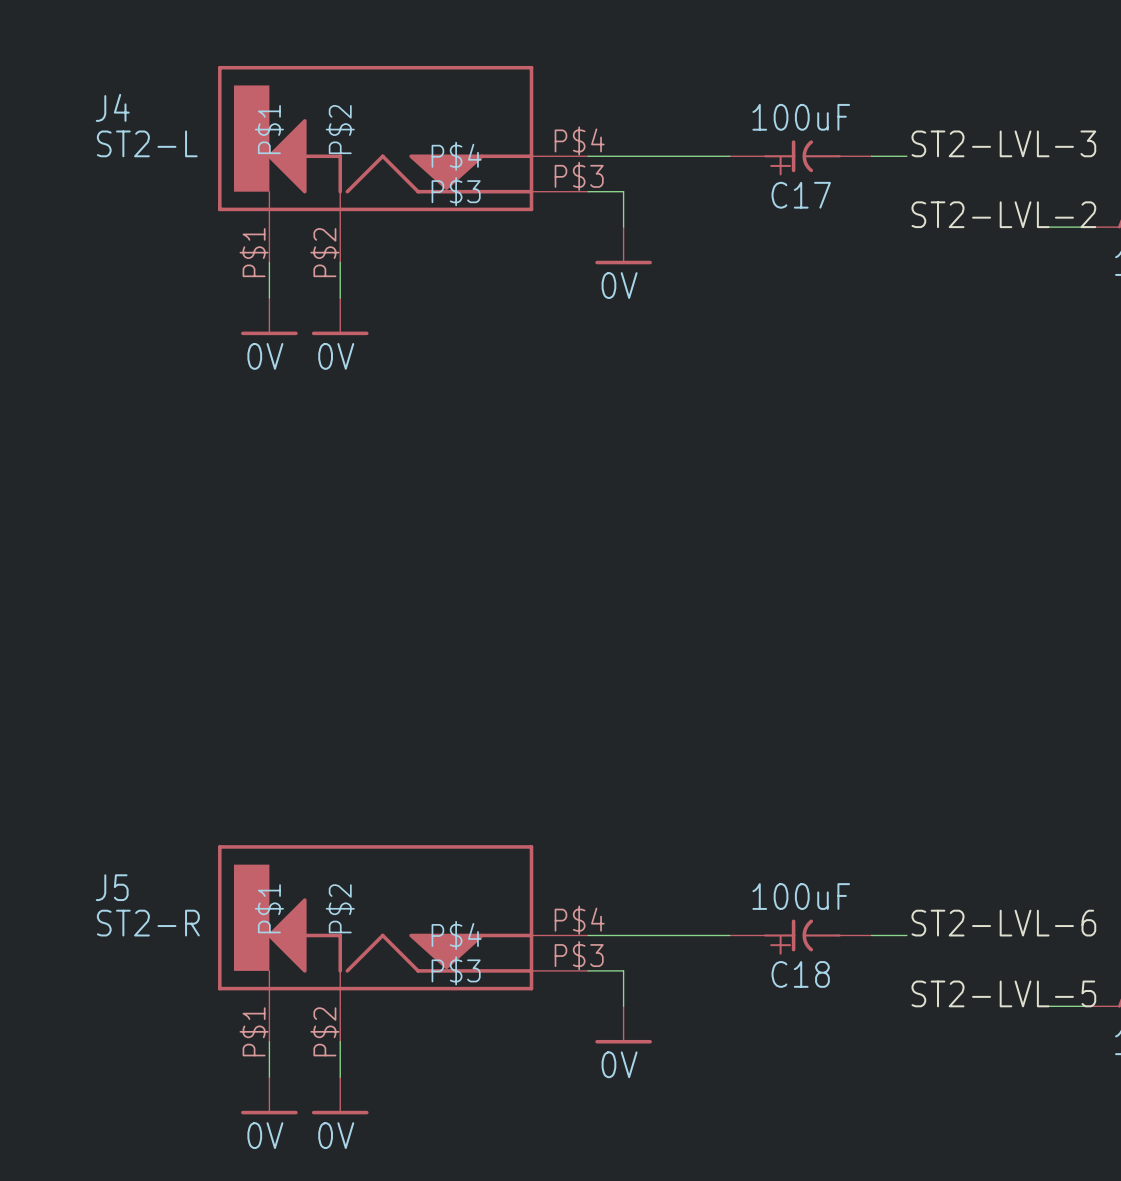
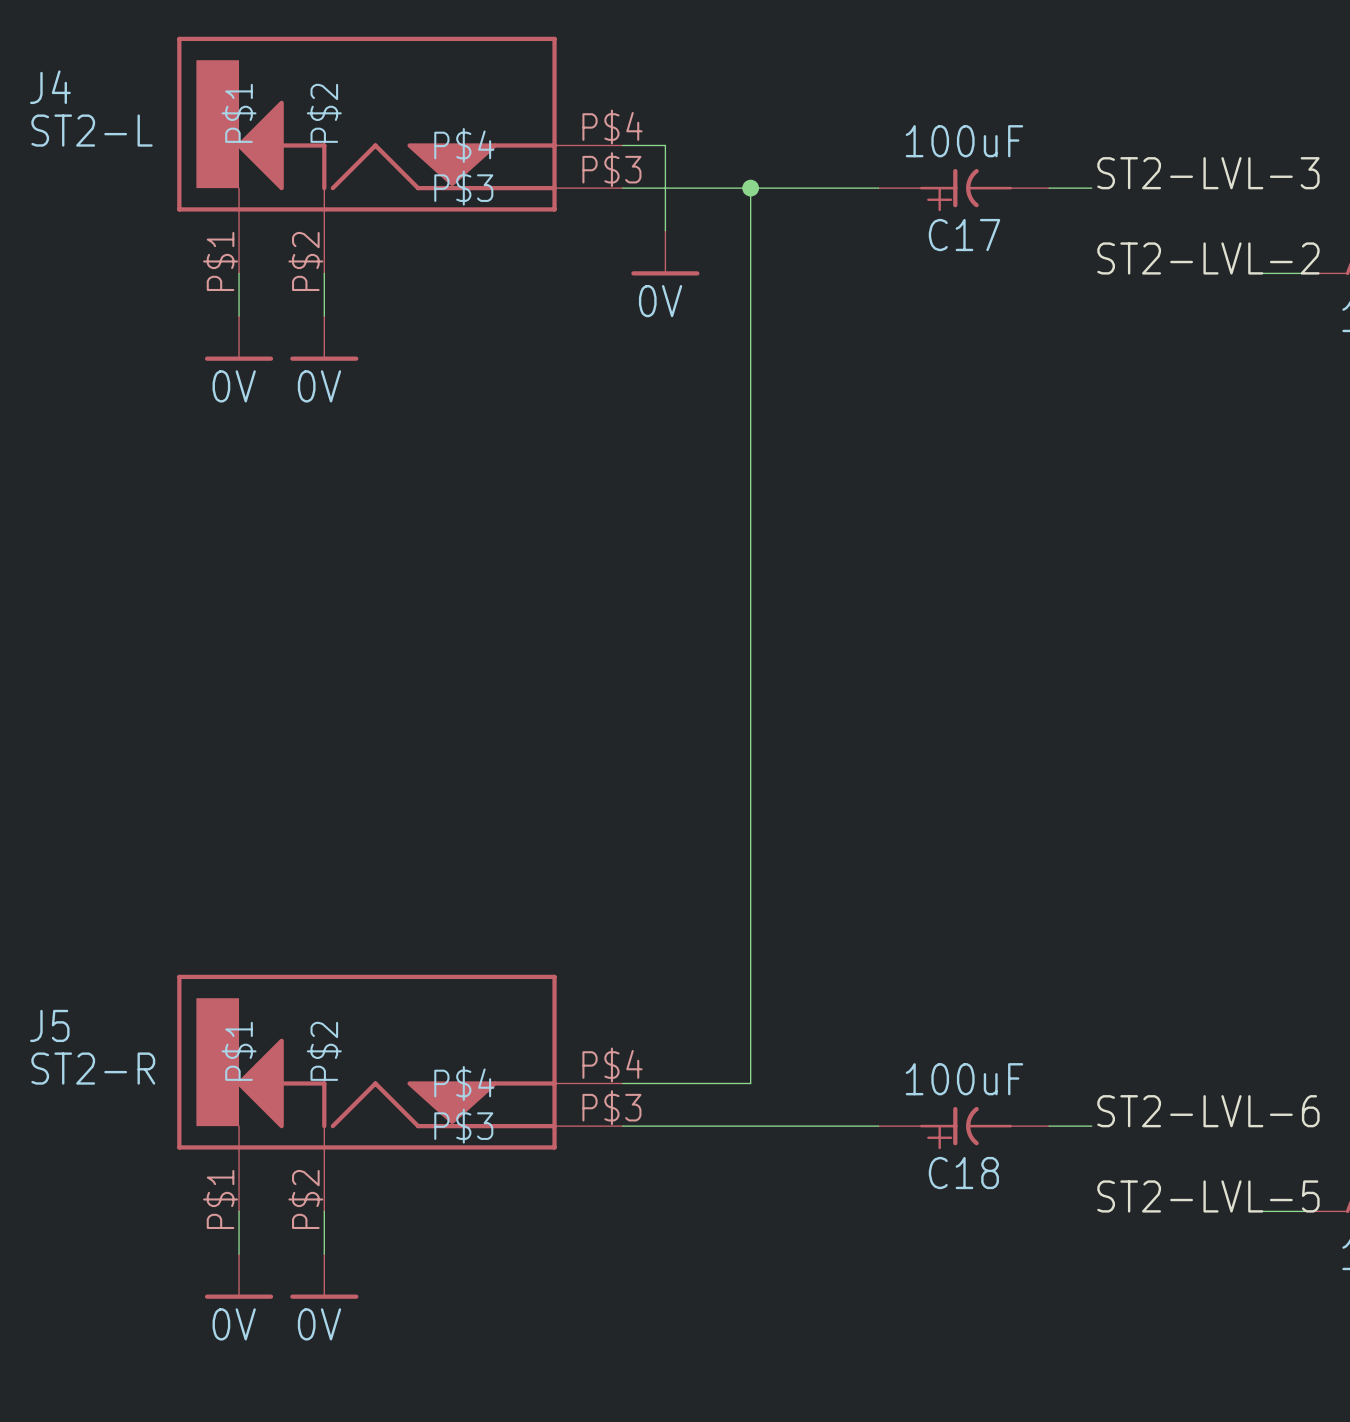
wire: none -> (622, 145) (665, 145) (665, 230)
junction: none -> (750, 188)
J4 position: (403, 164) -> (399, 155)
wire: (588, 191) (623, 191) -> (750, 188) (750, 230)
wire: none -> (750, 273) (750, 1083) (622, 1083)
power symbol position: 0V (623, 245) -> 0V (665, 253)
wire: (340, 262) (340, 297) -> (239, 273) (239, 316)
power symbol: none -> 0V (239, 338)
power symbol position: 0V (269, 316) -> 0V (324, 338)
power symbol: 0V (340, 316) -> none
J5 position: (403, 943) -> (399, 1093)
wire: (588, 970) (623, 970) (623, 1006) -> none
power symbol: 0V (623, 1024) -> none
wire: (340, 1041) (340, 1077) -> (239, 1211) (239, 1254)
power symbol: none -> 0V (239, 1276)
power symbol position: 0V (269, 1095) -> 0V (324, 1276)
power symbol: 0V (340, 1095) -> none

